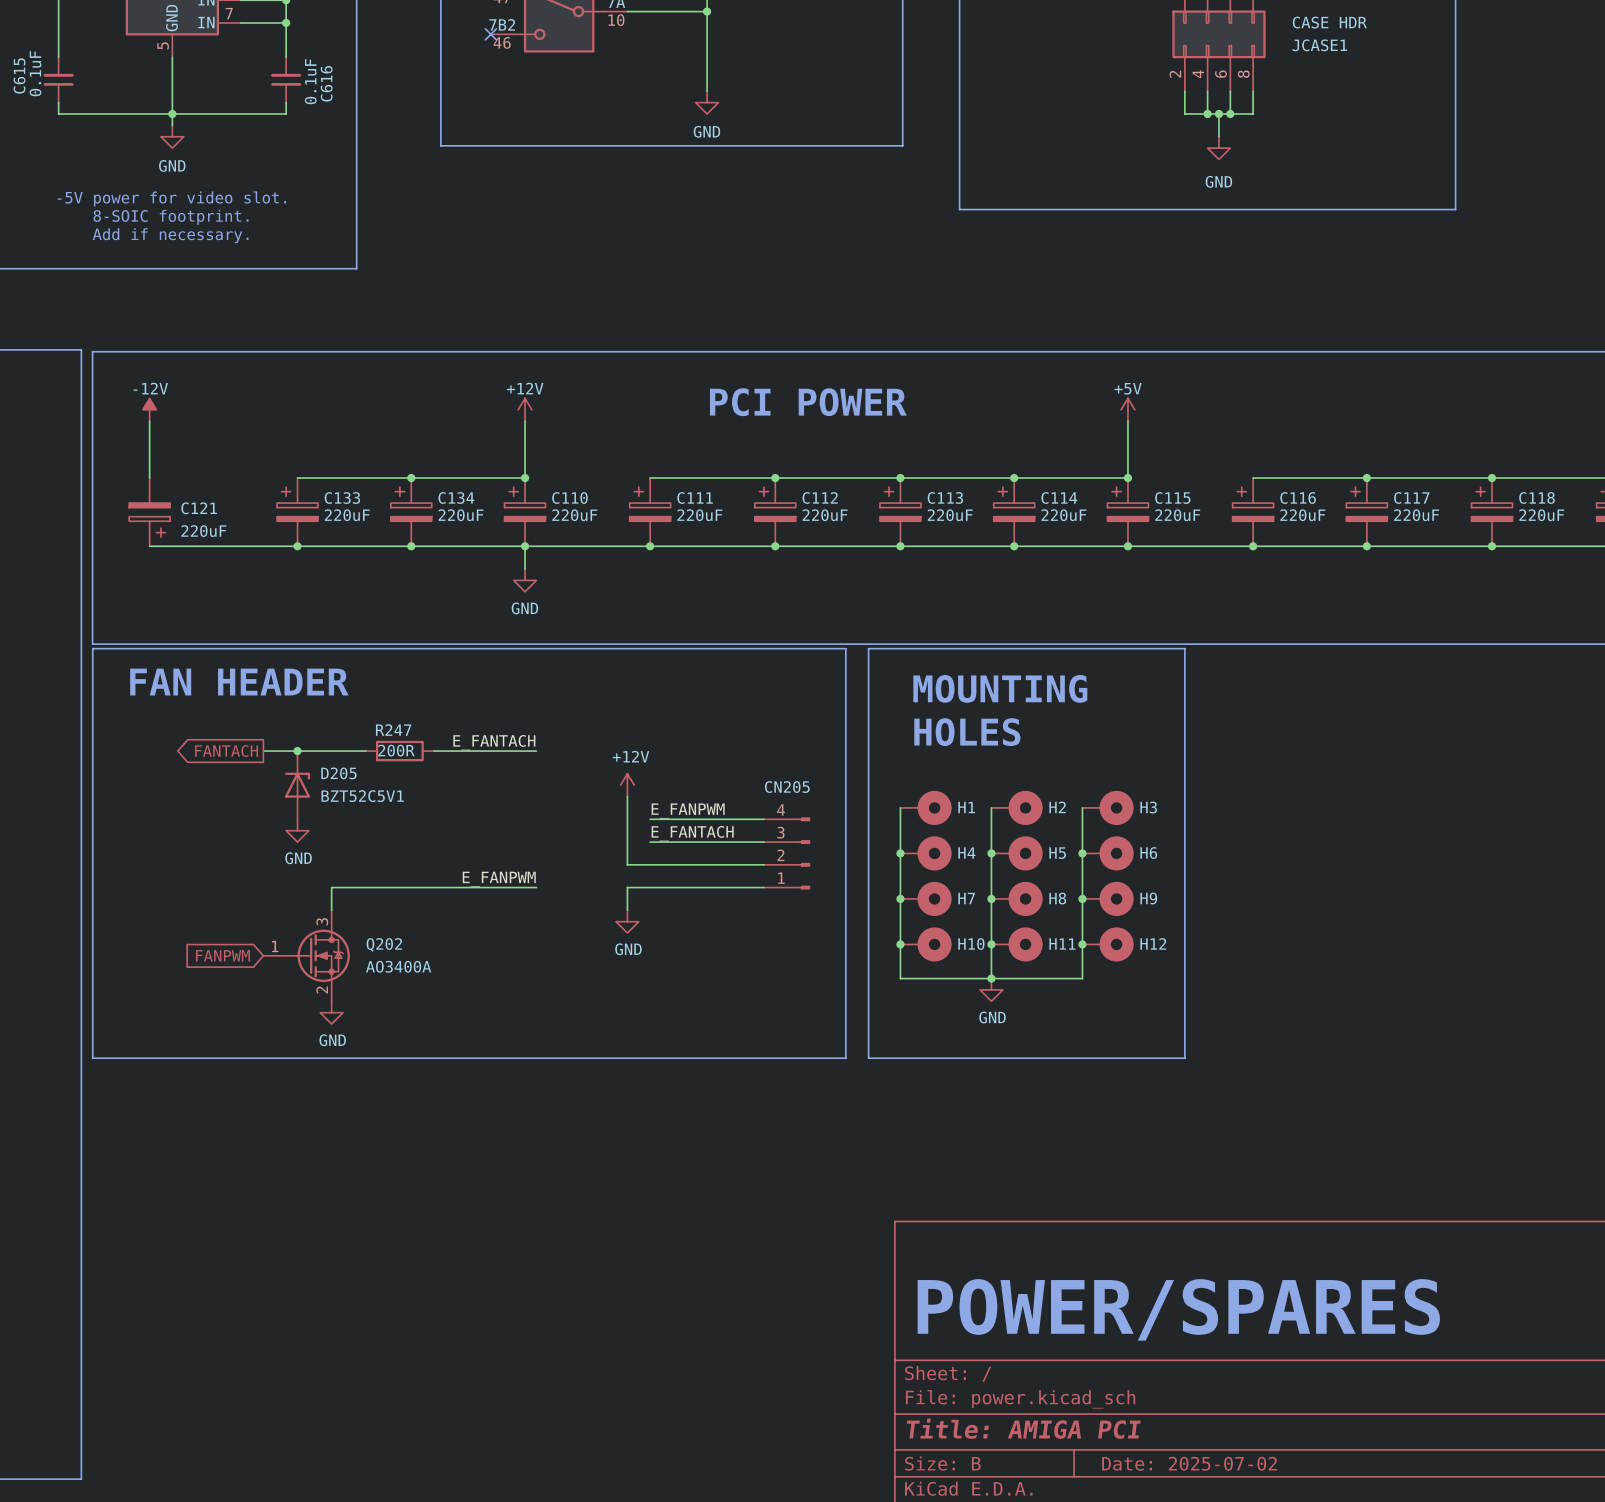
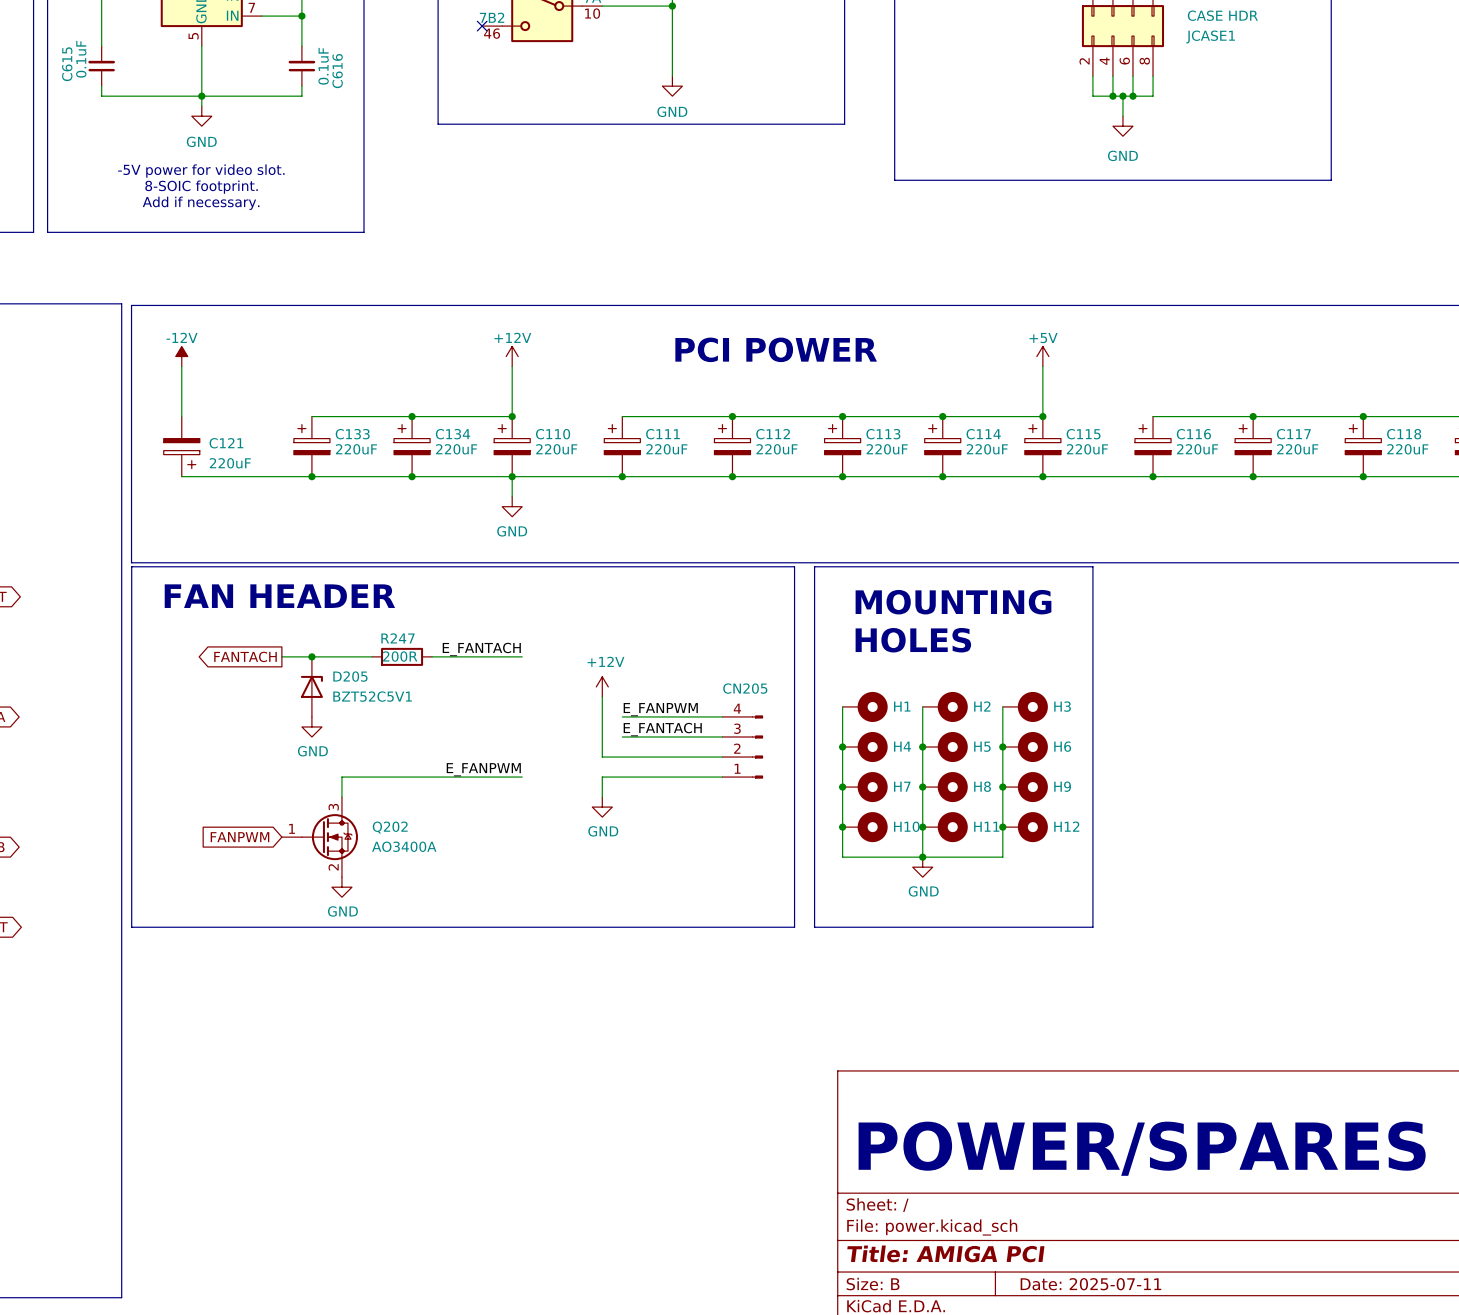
title block: Date: 2025-07-02 (1189, 1463) -> Date: 2025-07-11 (1090, 1284)

